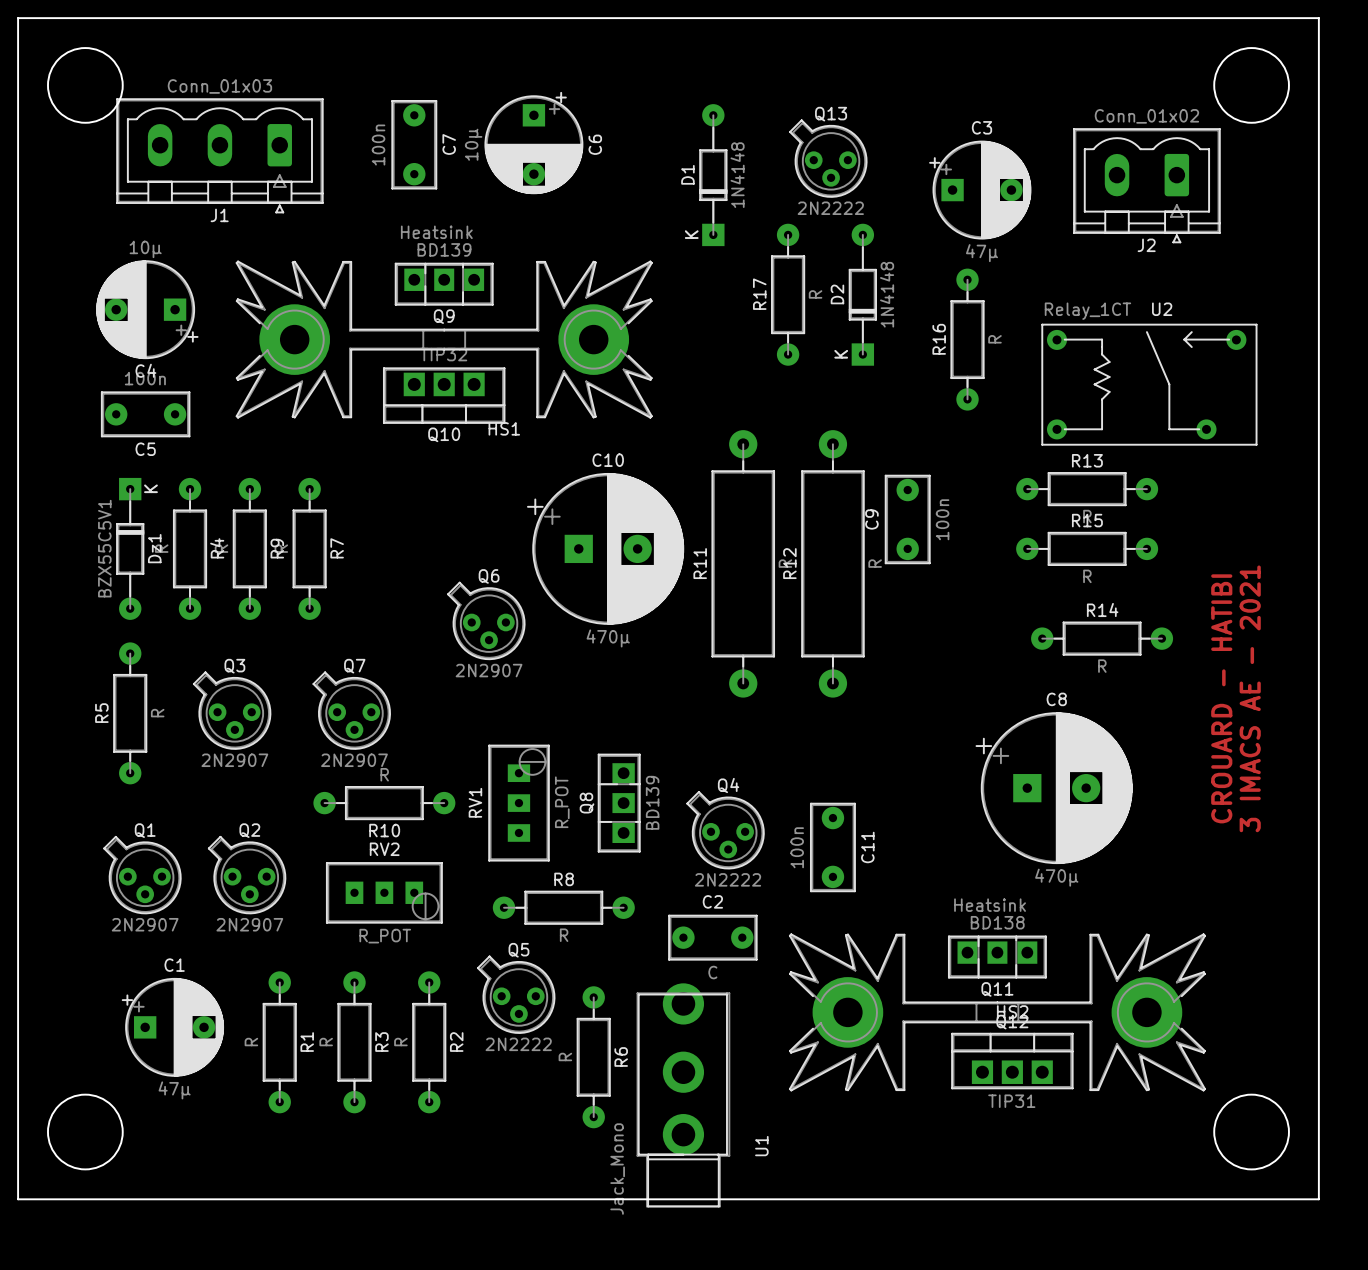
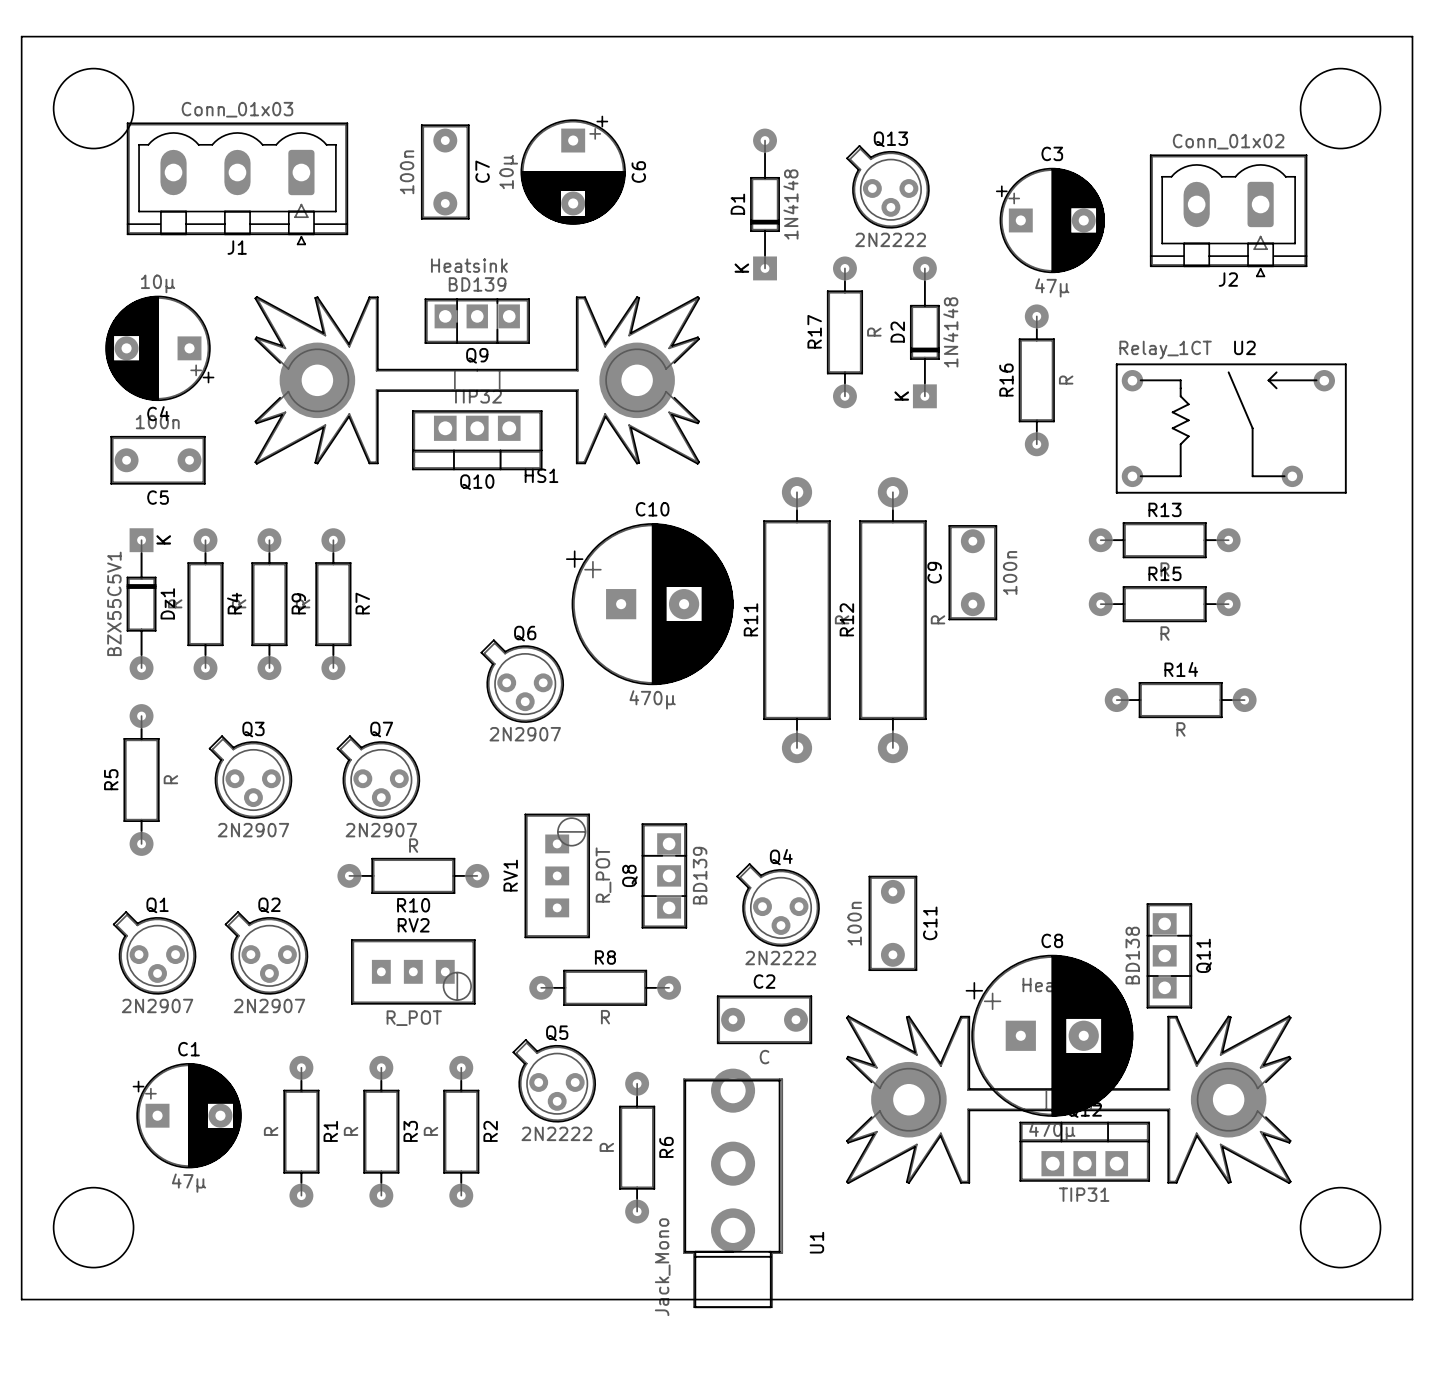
text: CROUARD - HATIBI (1221, 698) -> none
text: 3 IMACS AE - 2021 (1250, 698) -> none
C8 position: (1054, 788) -> (1049, 1035)
Q11 rotation: 0° (997, 957) -> 90° counterclockwise (1169, 955)
Q11 position: (997, 957) -> (1169, 955)

